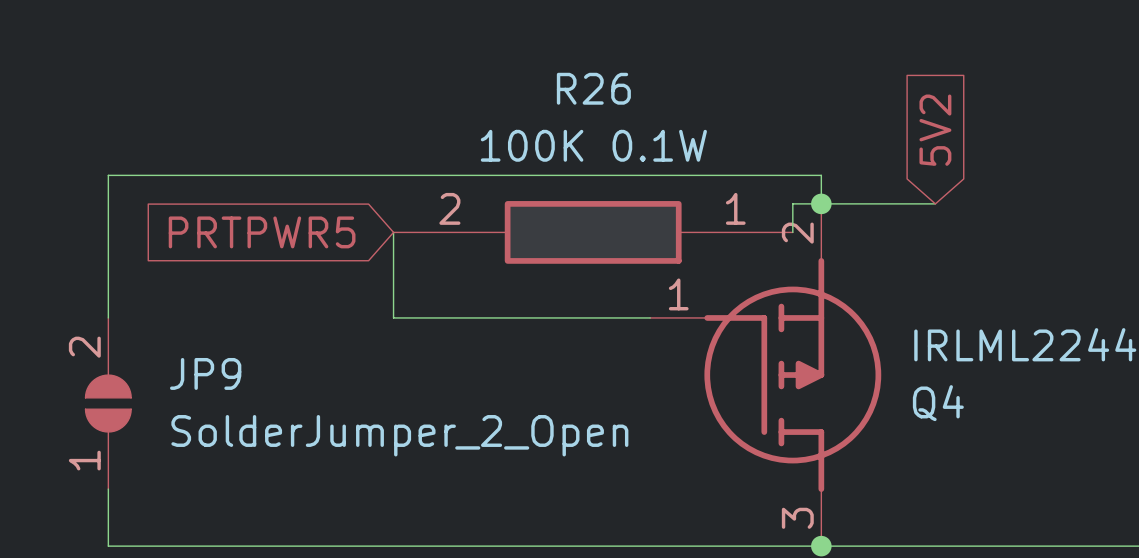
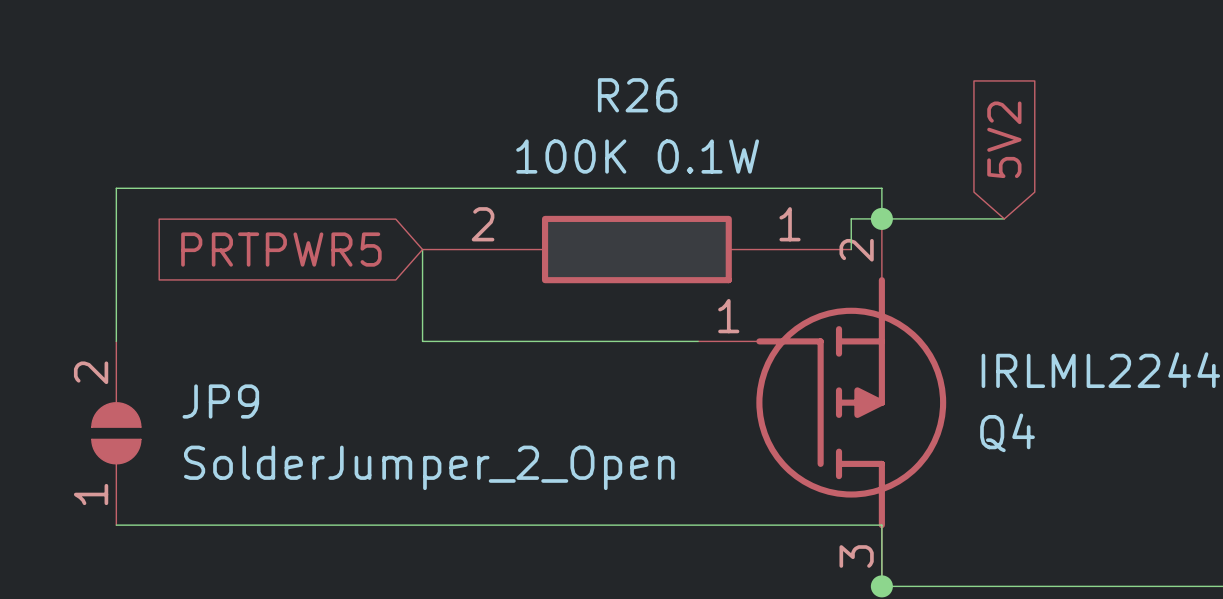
wire: (108, 489) (108, 546) (821, 546) -> (116, 525) (881, 525) (881, 586)

